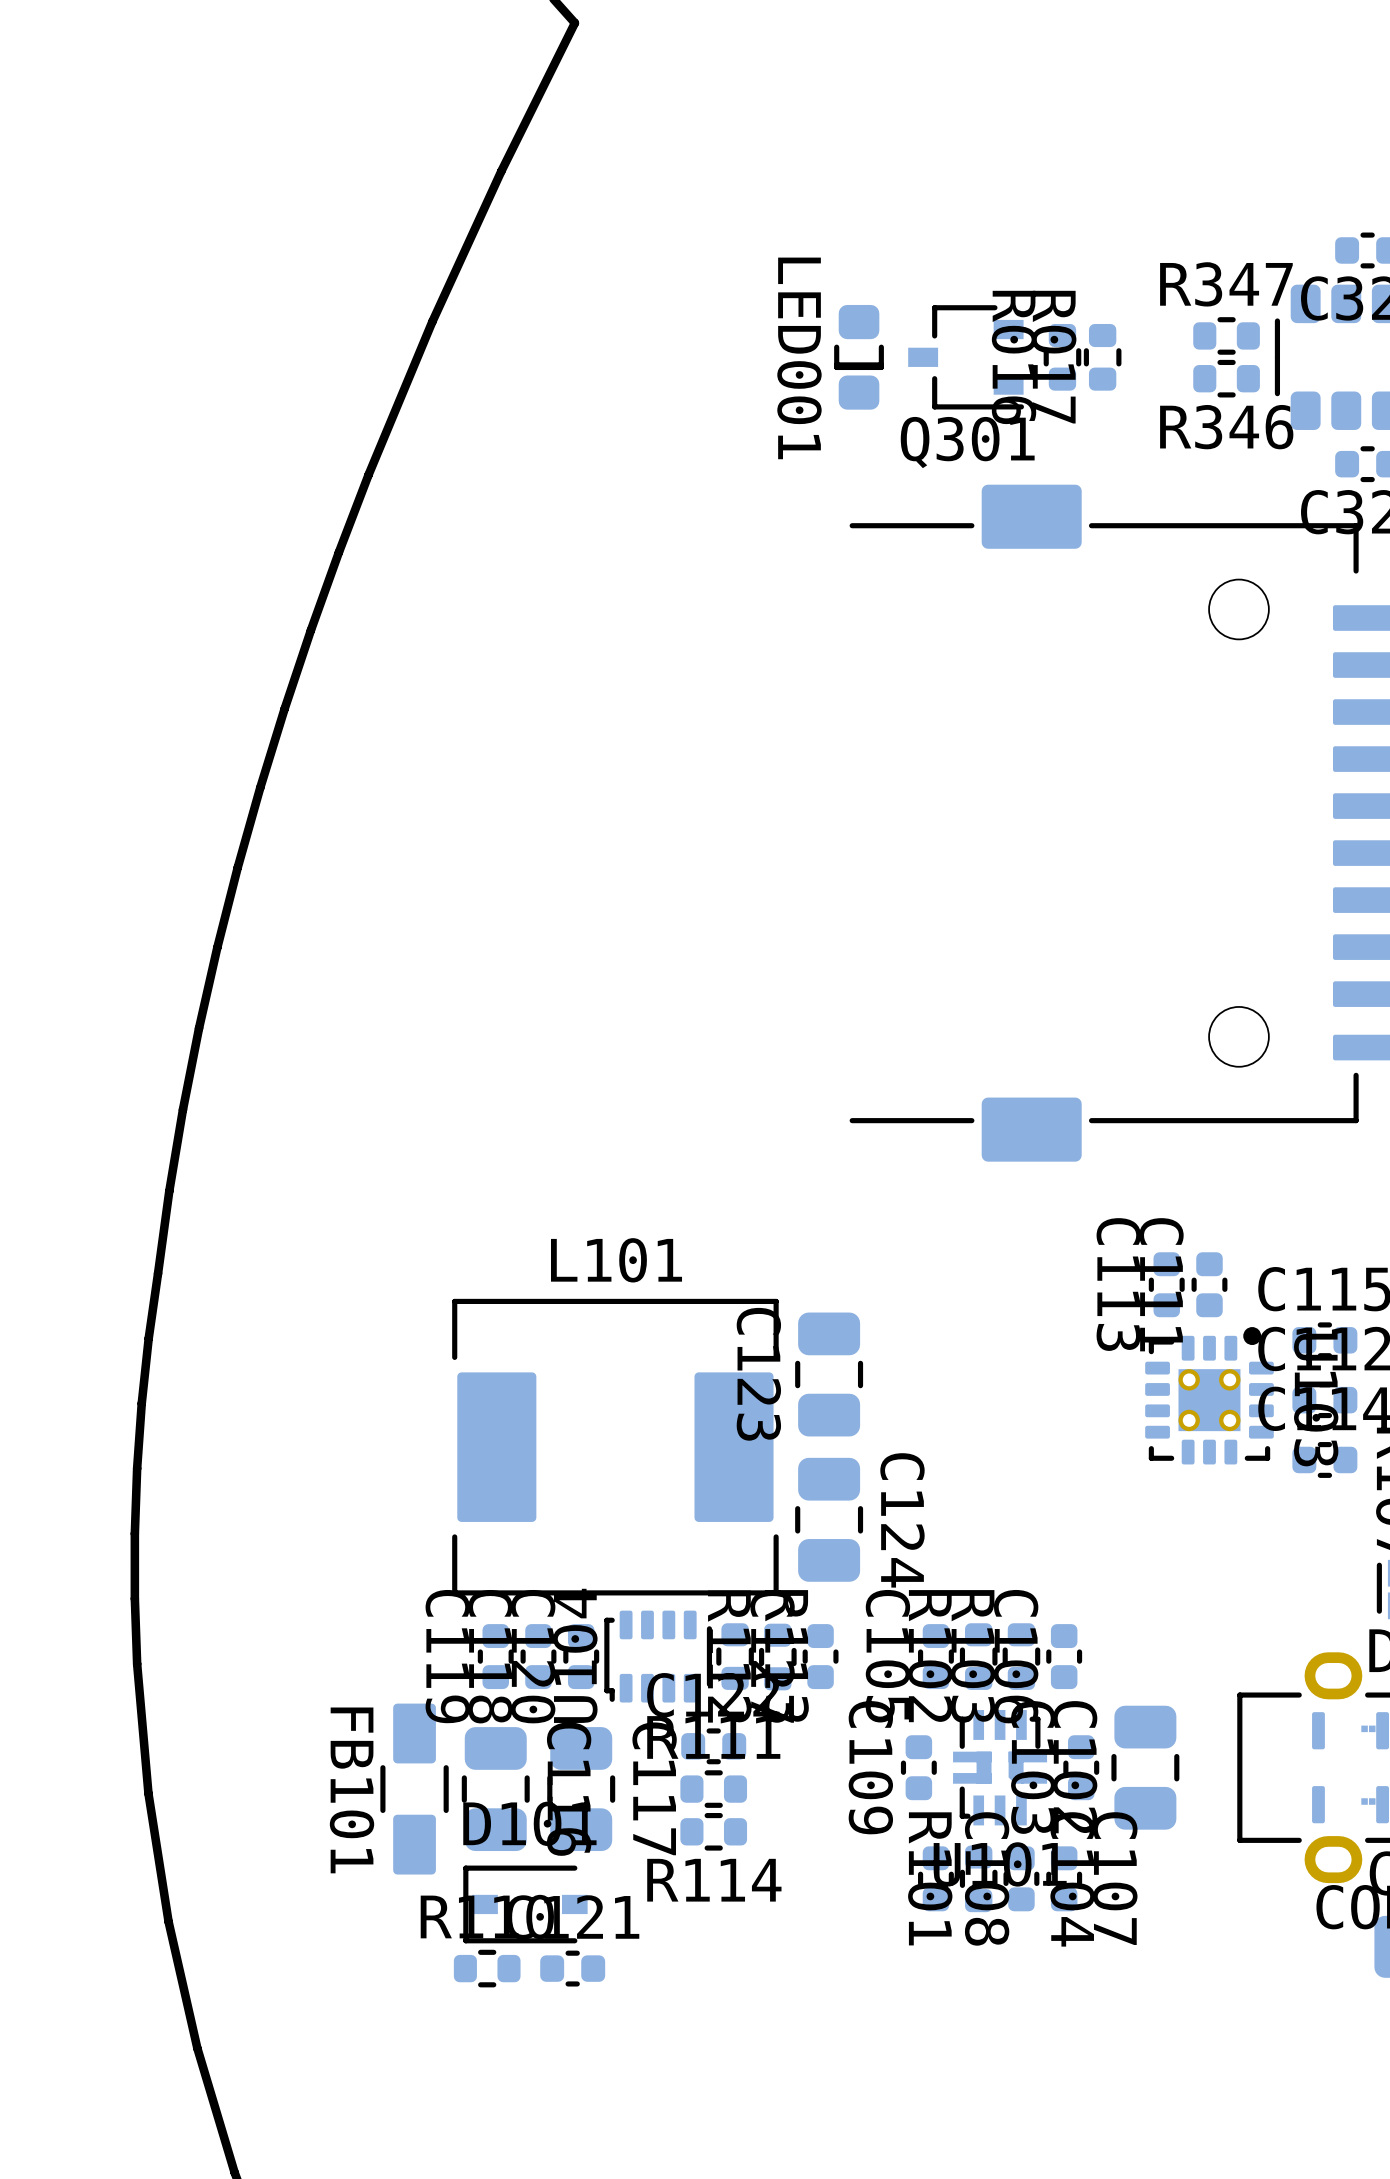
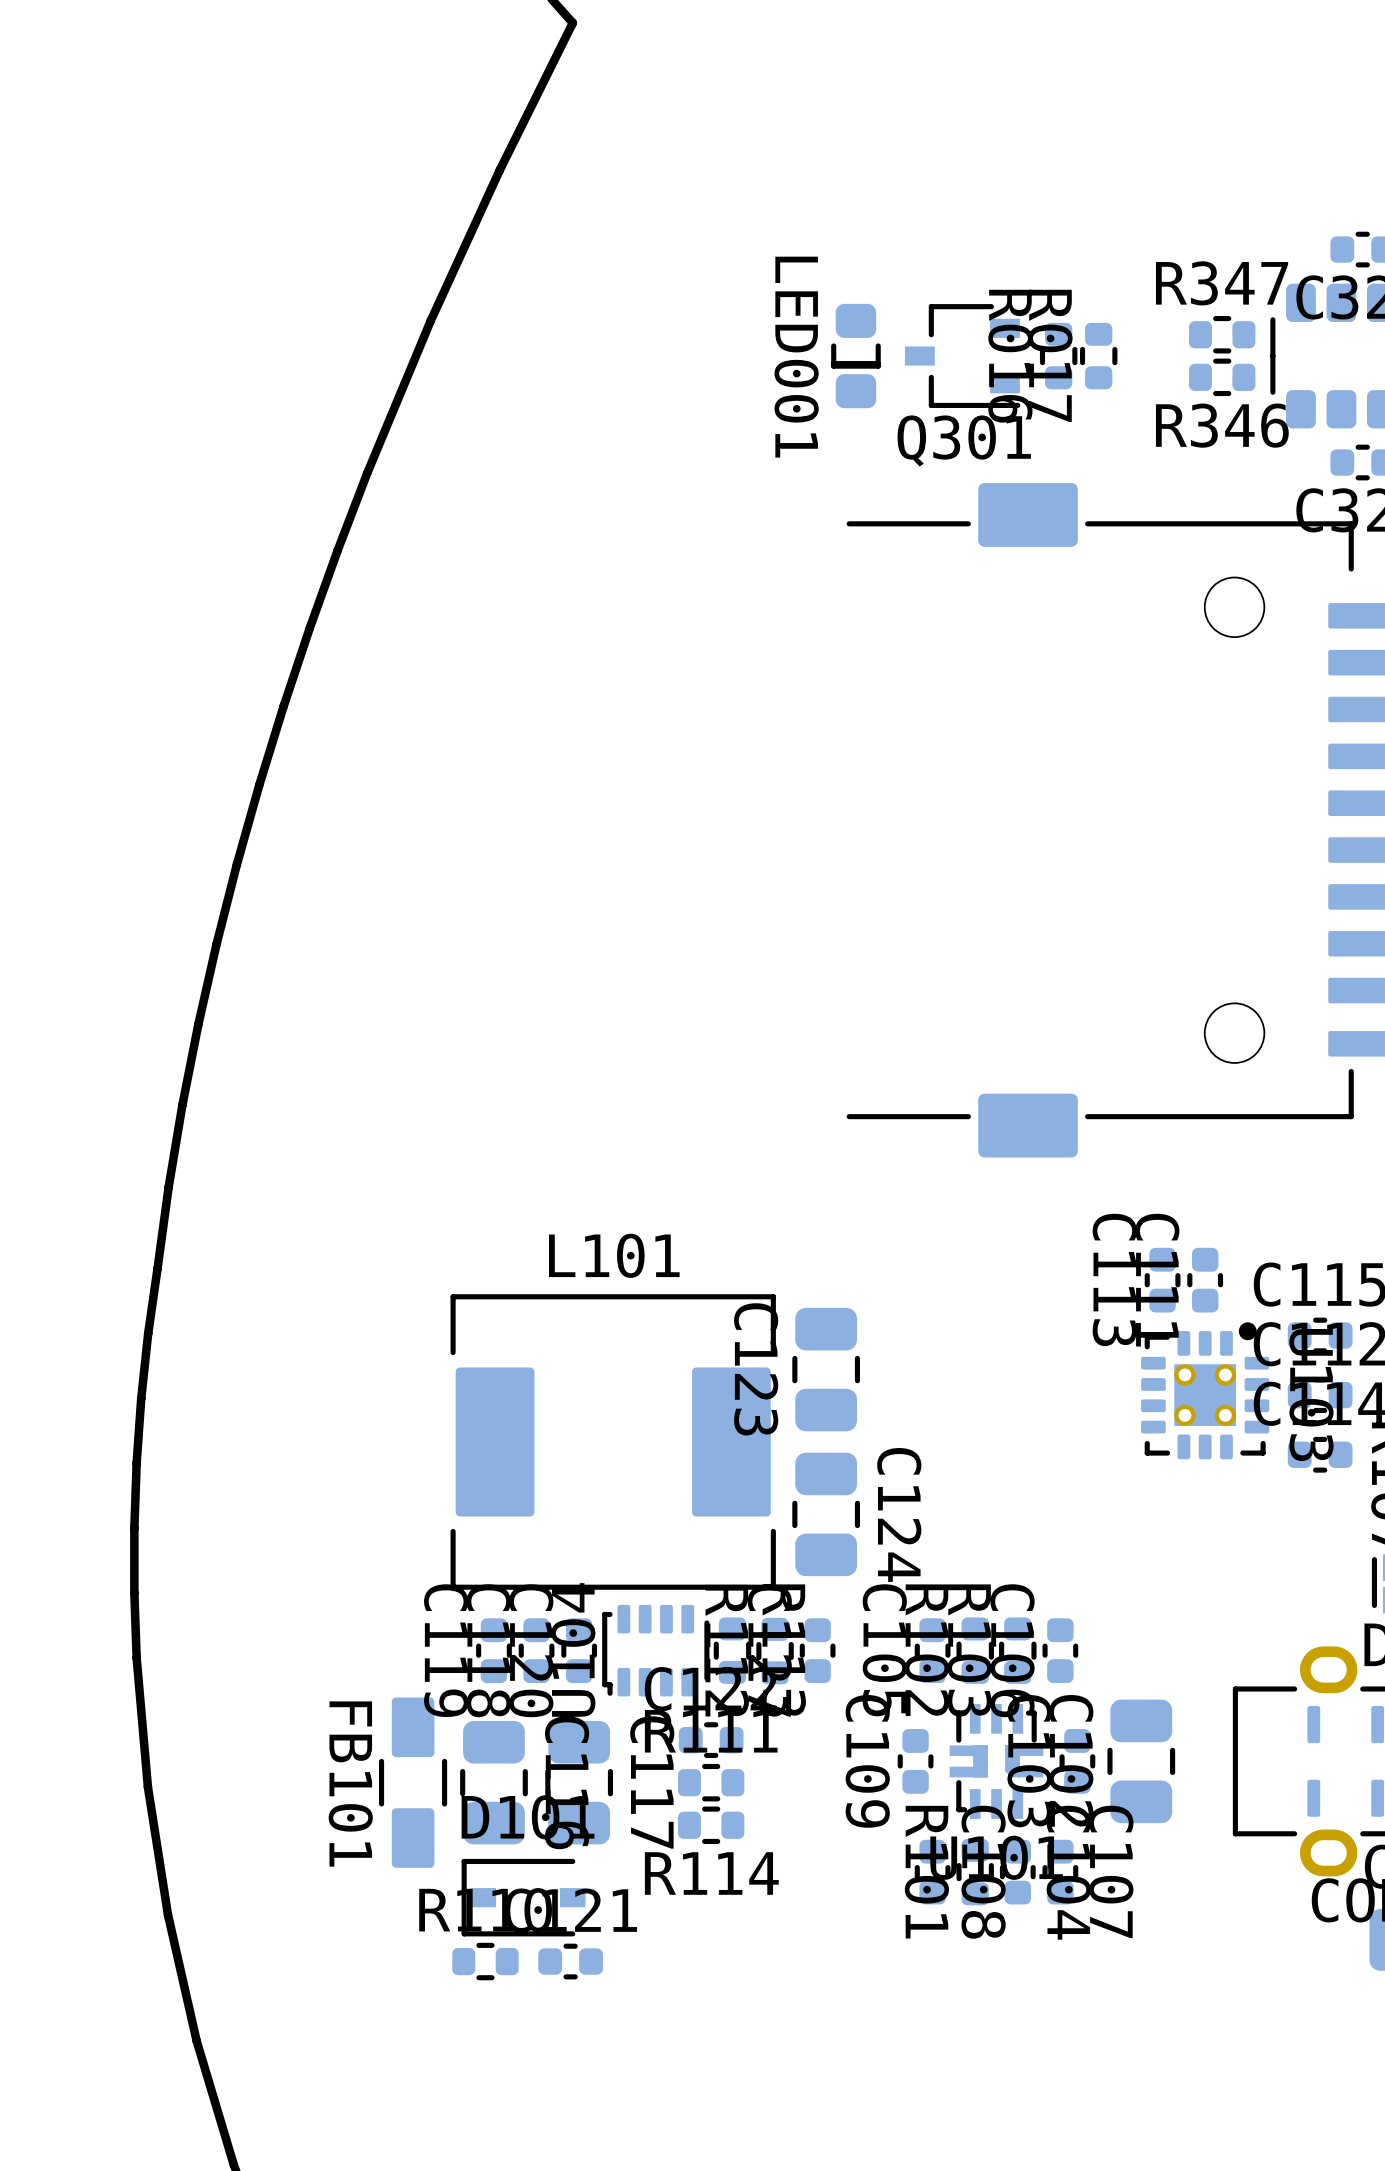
part: (1368, 1728) -> none
part: (1368, 1801) -> none

